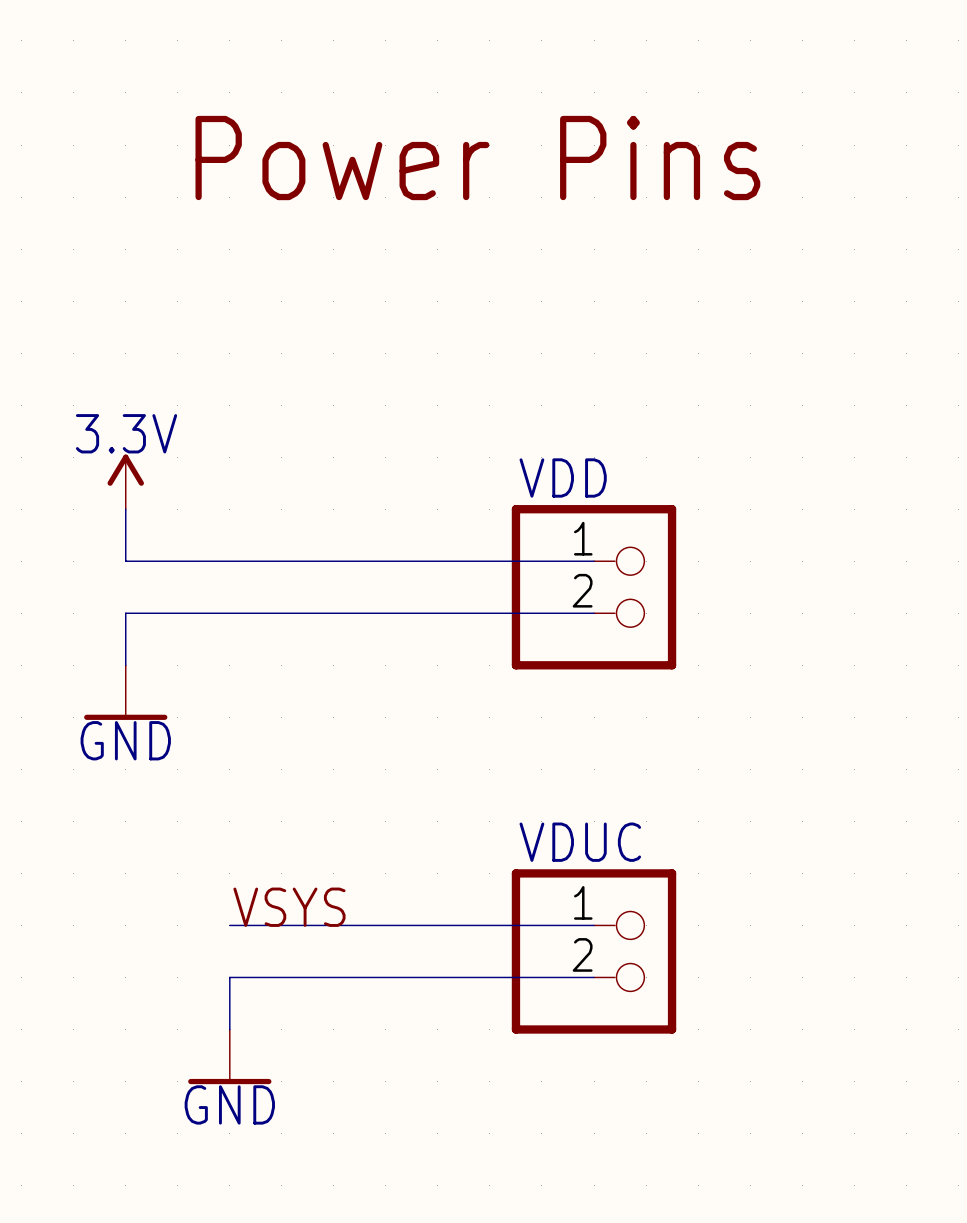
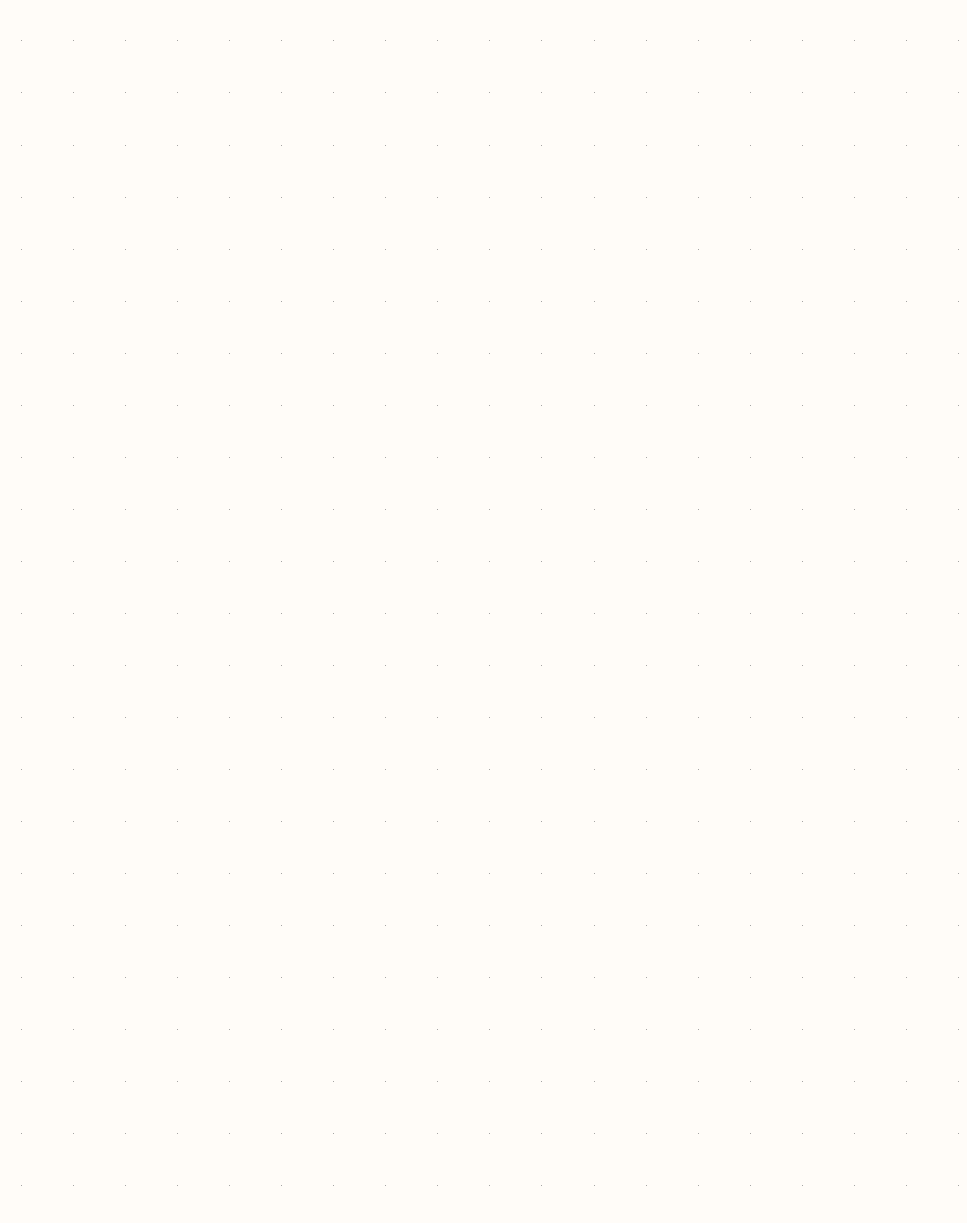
text: Power Pins (477, 158) -> none
power symbol: 3.3V (125, 481) -> none
wire: (125, 509) (125, 561) (594, 561) -> none
VDD: (594, 587) -> none
wire: (594, 613) (125, 613) (125, 665) -> none
power symbol: GND (125, 692) -> none
label: VSYS (289, 907) -> none
wire: (229, 925) (594, 925) -> none
VDUC: (594, 951) -> none
wire: (594, 977) (229, 977) (229, 1029) -> none
power symbol: GND (229, 1056) -> none

